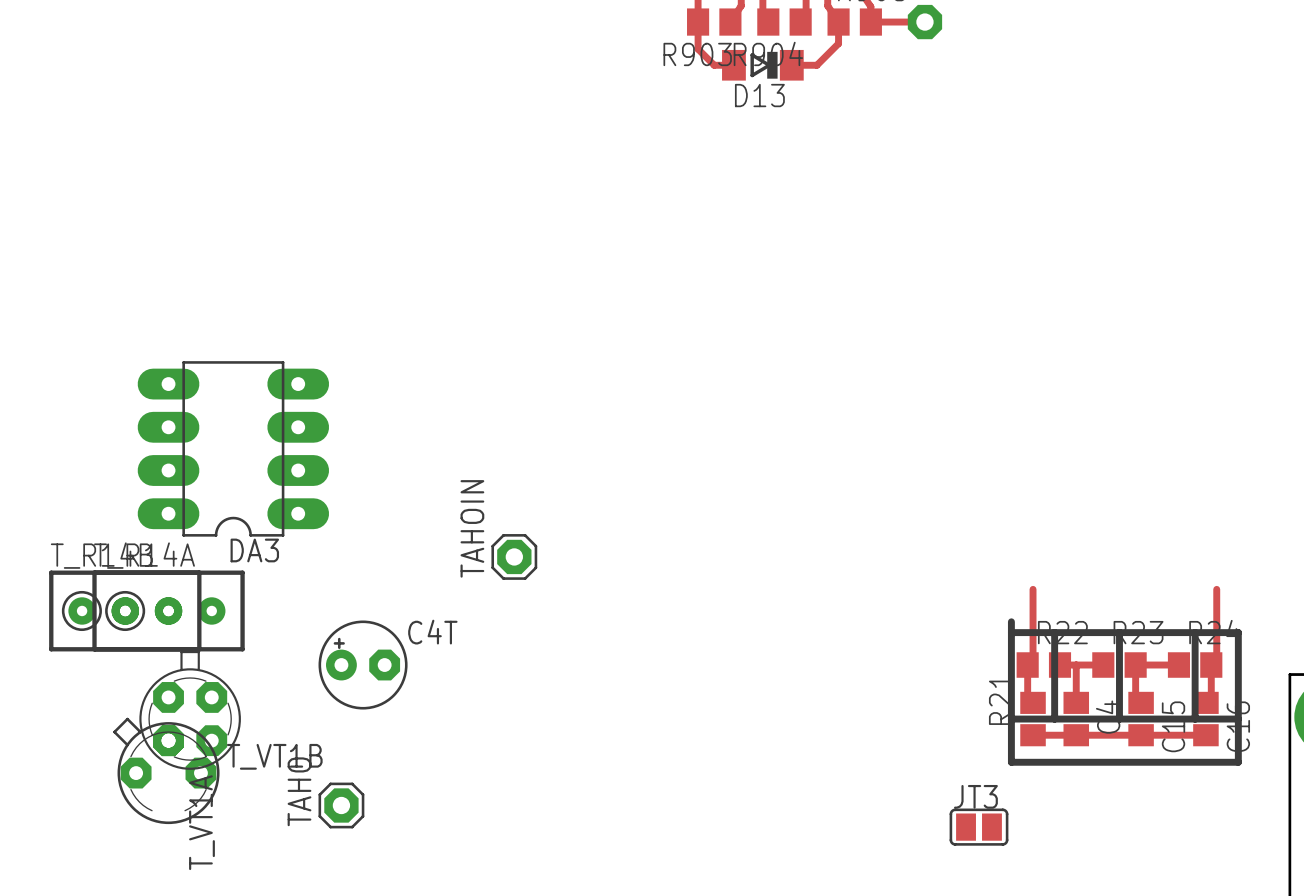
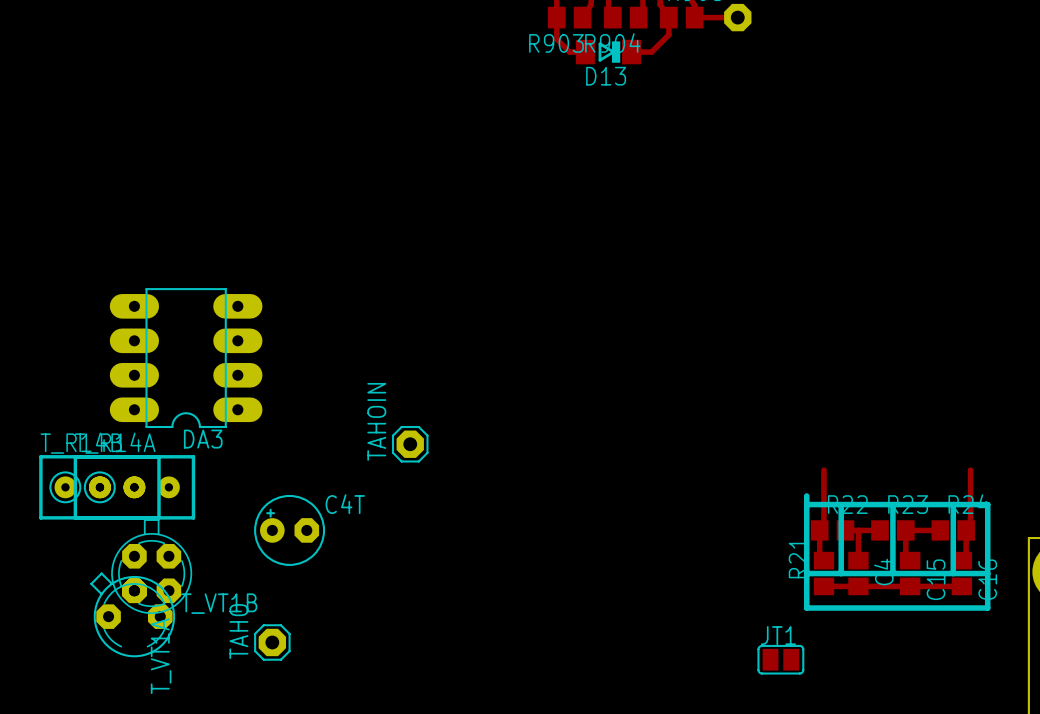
JT3 name: JT3 (975, 796) -> JT1 (778, 635)

